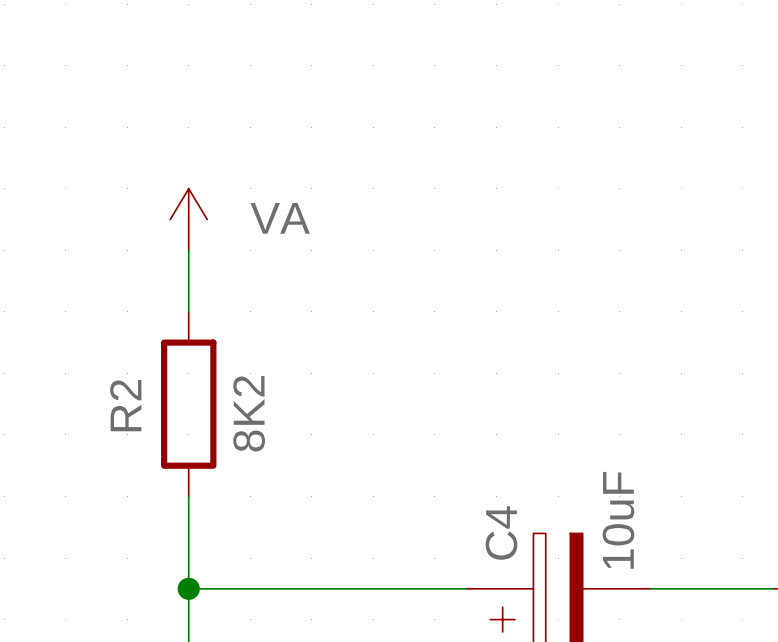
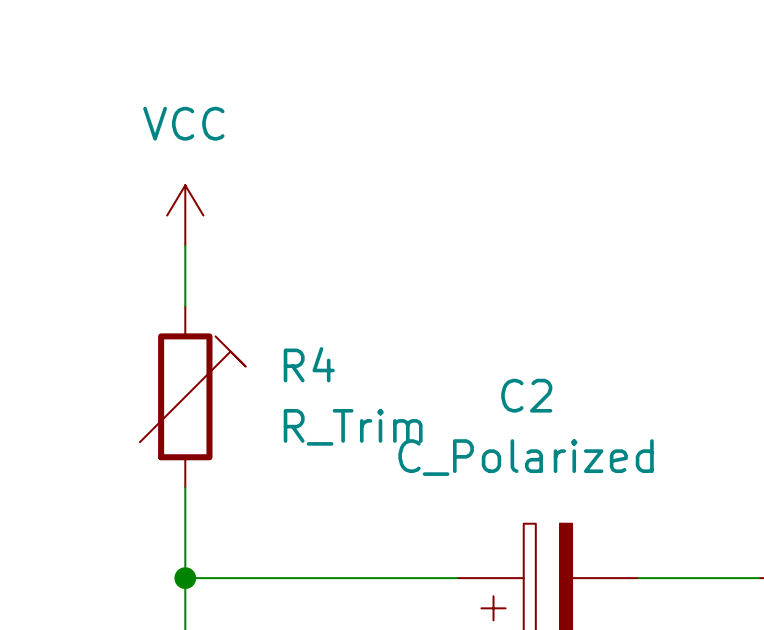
power symbol: VA (188, 219) -> VCC (185, 215)
R2: 8K2 (188, 404) -> none
R4: none -> R_Trim (192, 396)
C4 value: 10uF (618, 520) -> C_Polarized (526, 457)
C4 name: C4 (501, 532) -> C2 (526, 395)

